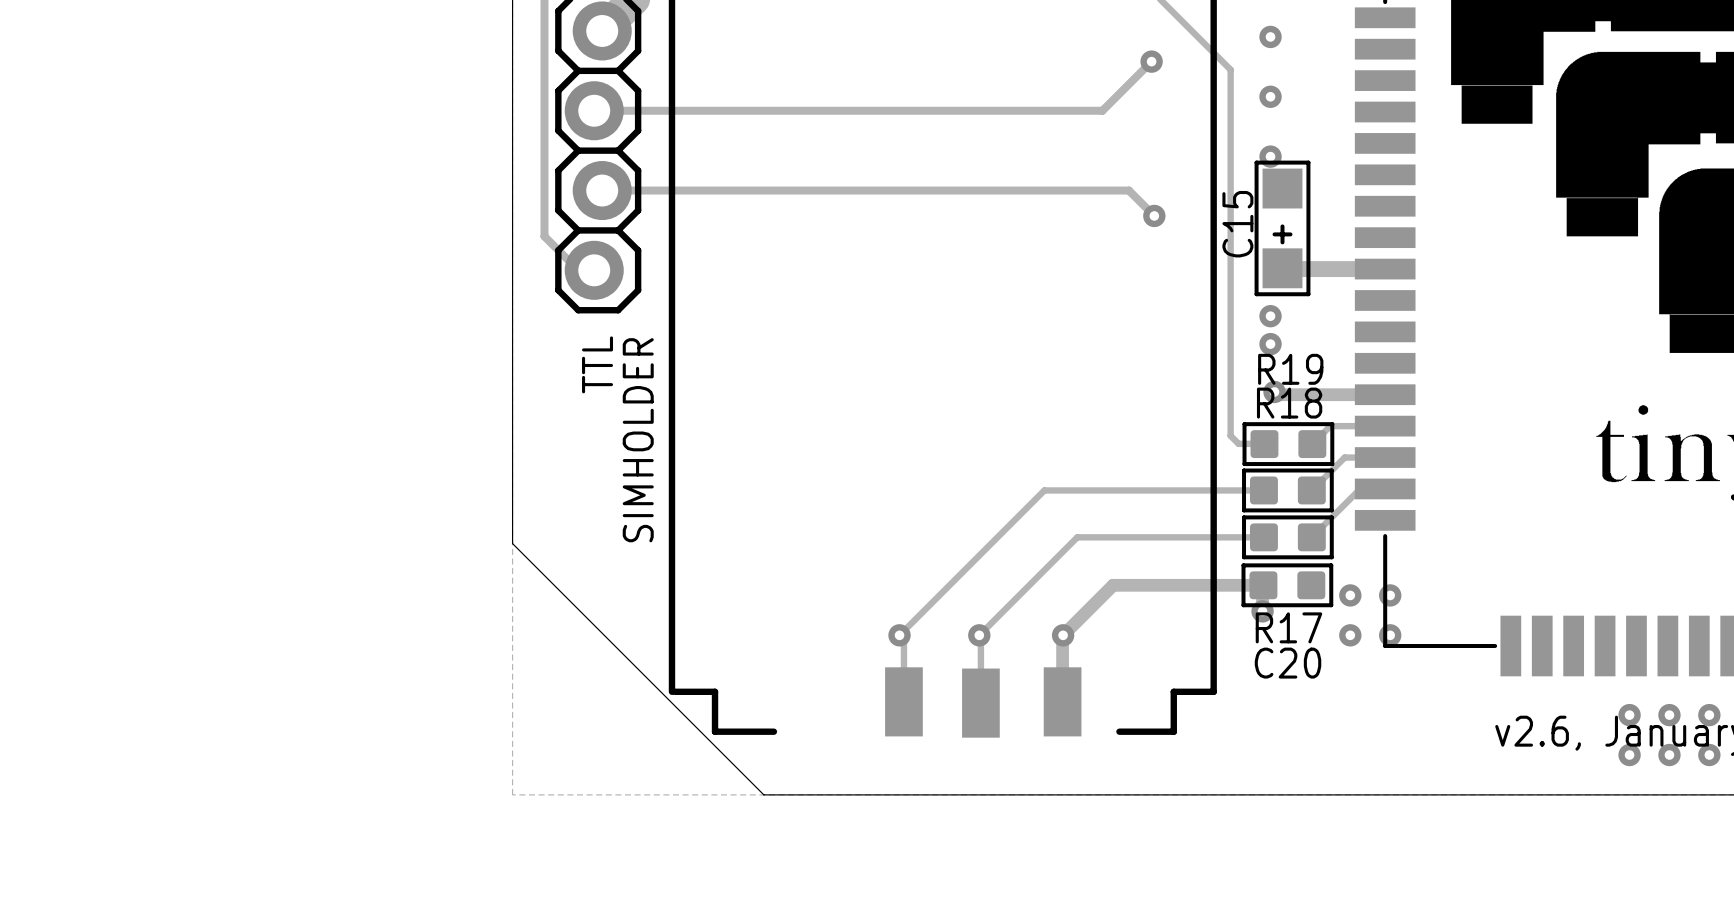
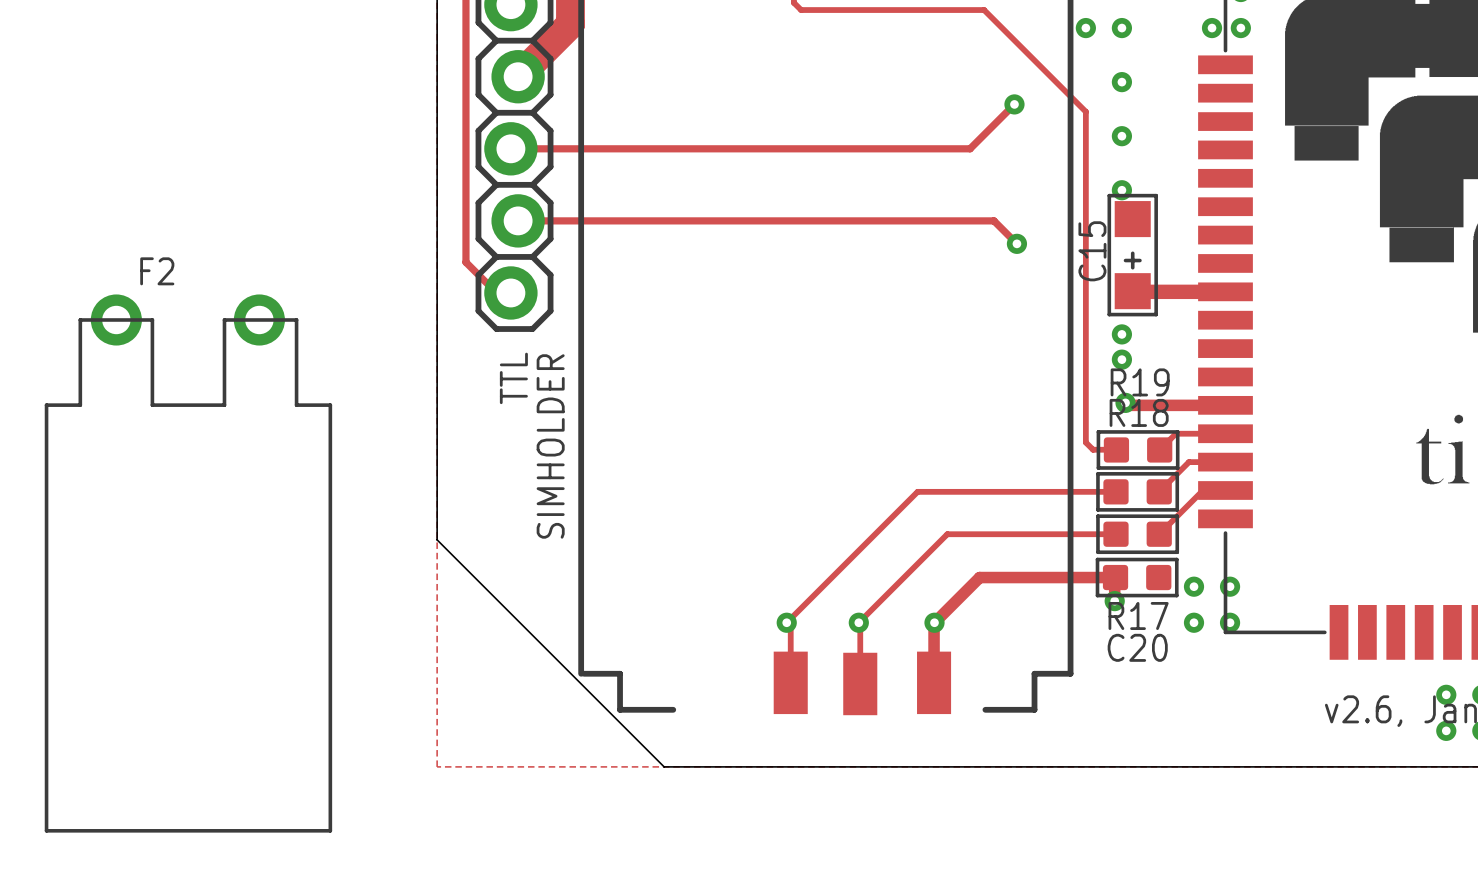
F2: none -> (188, 563)

